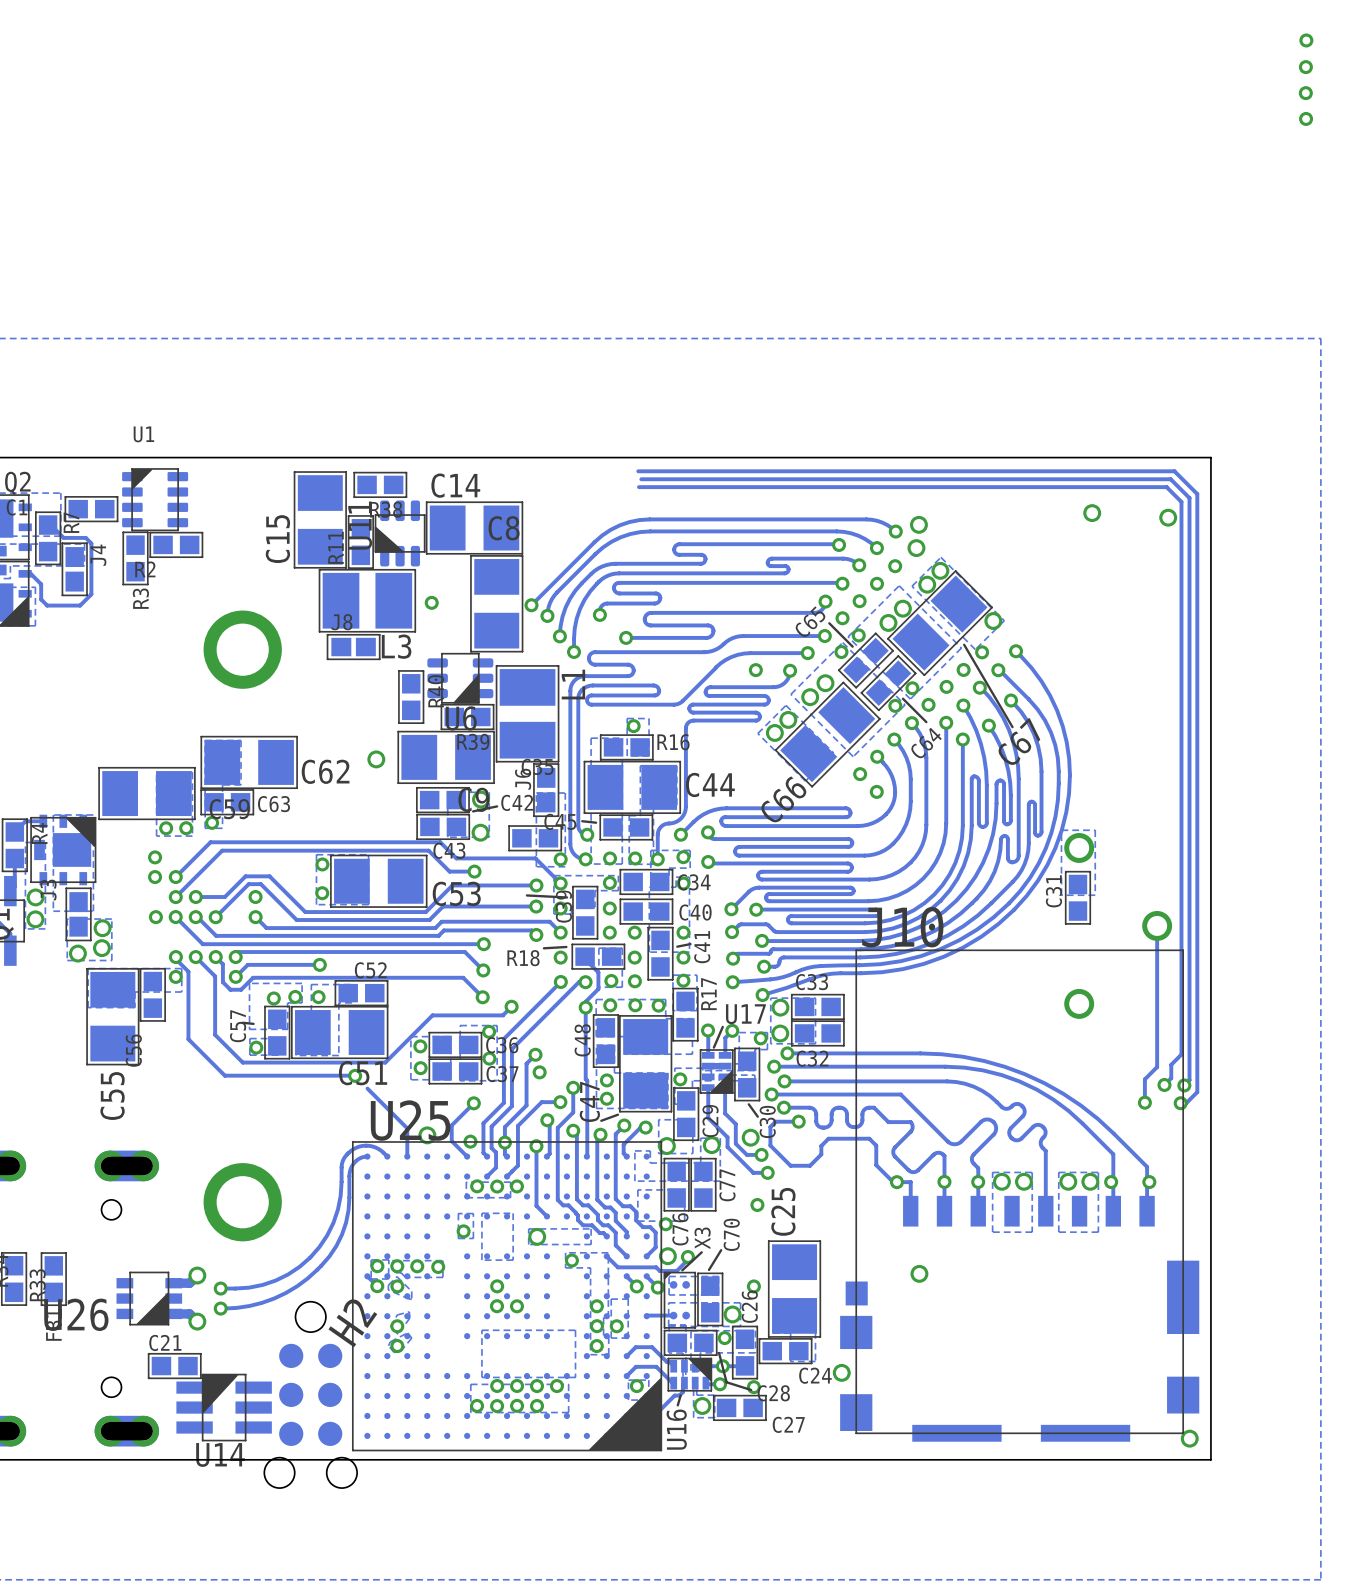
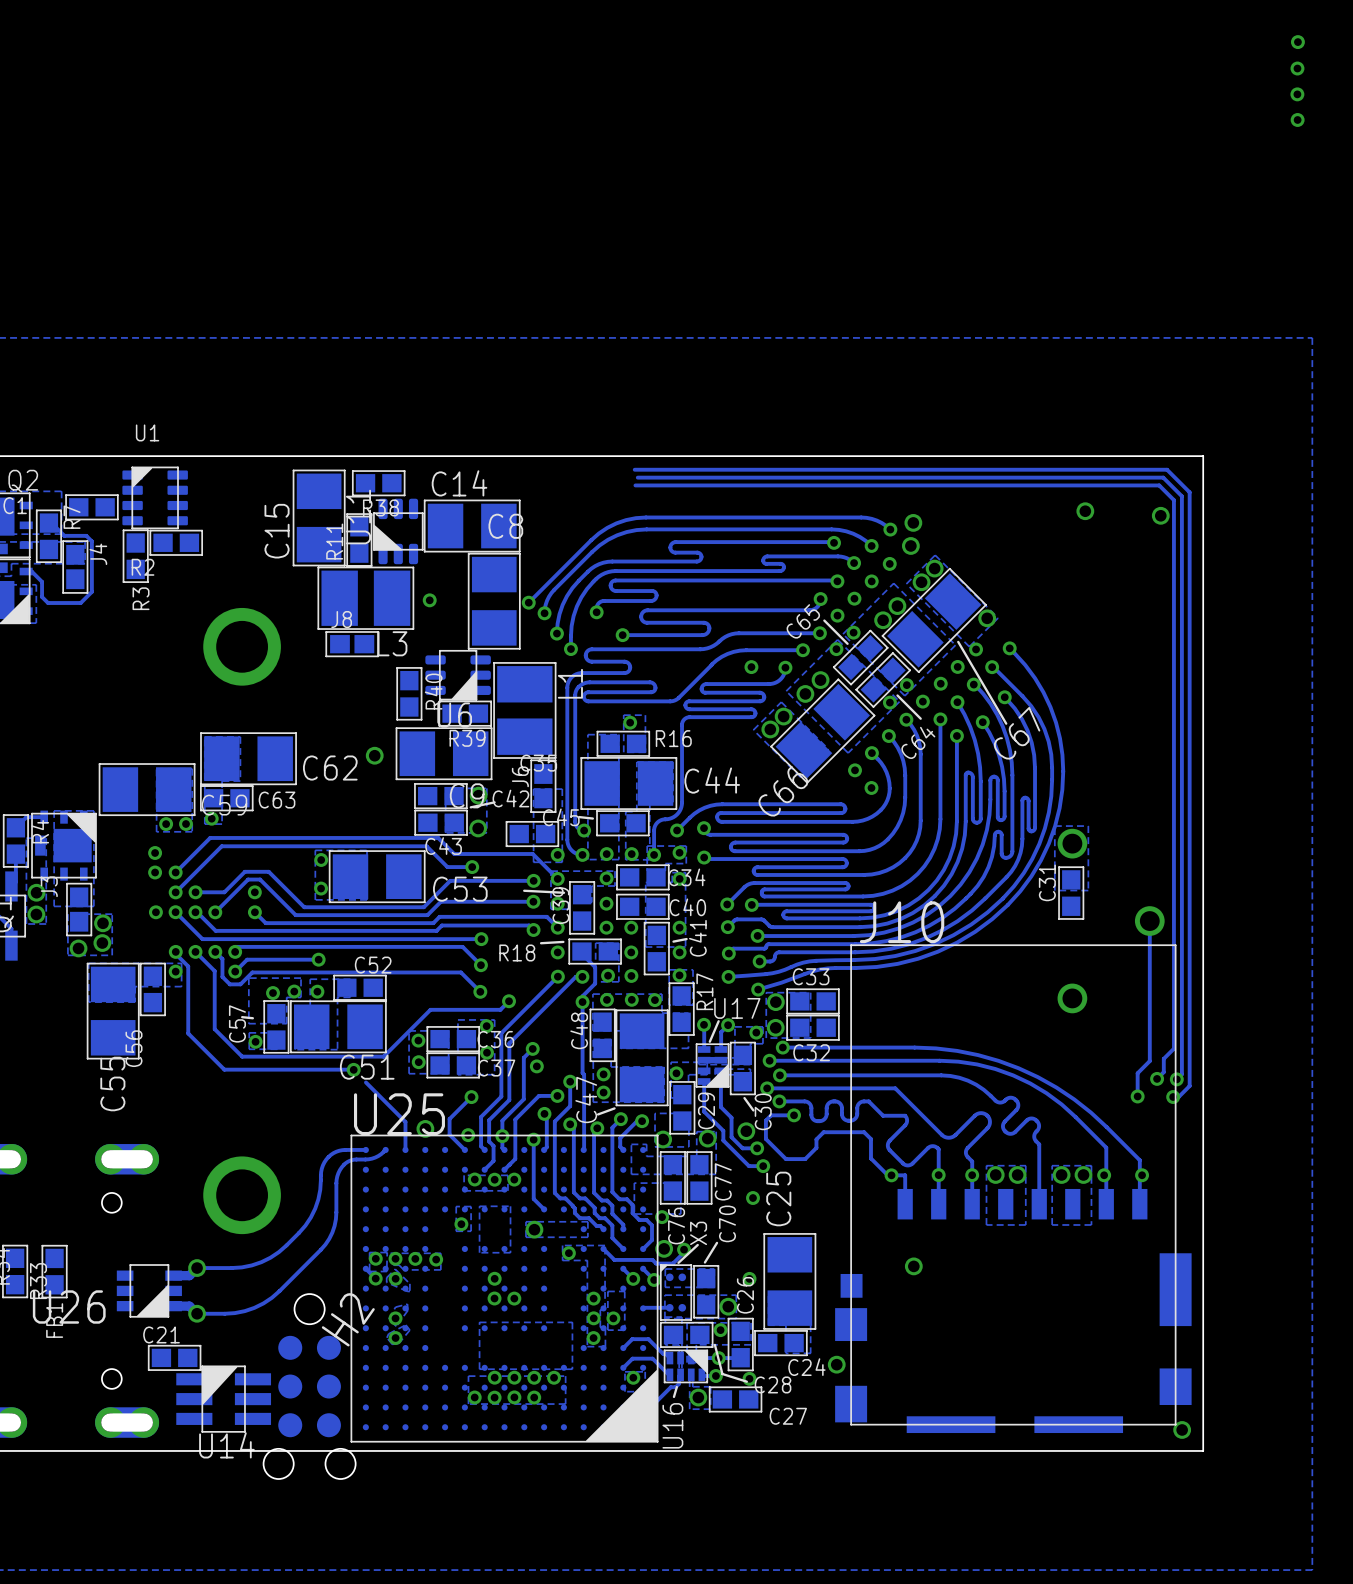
track: (367, 1156) (357, 1160) (350, 1168) (346, 1222) (336, 1246) (321, 1266) (297, 1286) (274, 1298) (249, 1306) (220, 1308) -> (365, 1149) (339, 1150) (326, 1159) (321, 1168) (318, 1199) (310, 1217) (299, 1232) (278, 1252) (261, 1262) (241, 1267) (197, 1268)
track: (387, 1156) (378, 1148) (366, 1145) (353, 1148) (345, 1156) (341, 1165) (340, 1195) (333, 1222) (319, 1247) (299, 1266) (275, 1280) (262, 1284) (249, 1287) (220, 1288) -> (385, 1149) (375, 1157) (351, 1160) (341, 1167) (336, 1179) (335, 1219) (329, 1238) (320, 1249) (271, 1297) (244, 1311) (224, 1313) (197, 1313)
via: (220, 1288) -> none
via: (220, 1308) -> none

